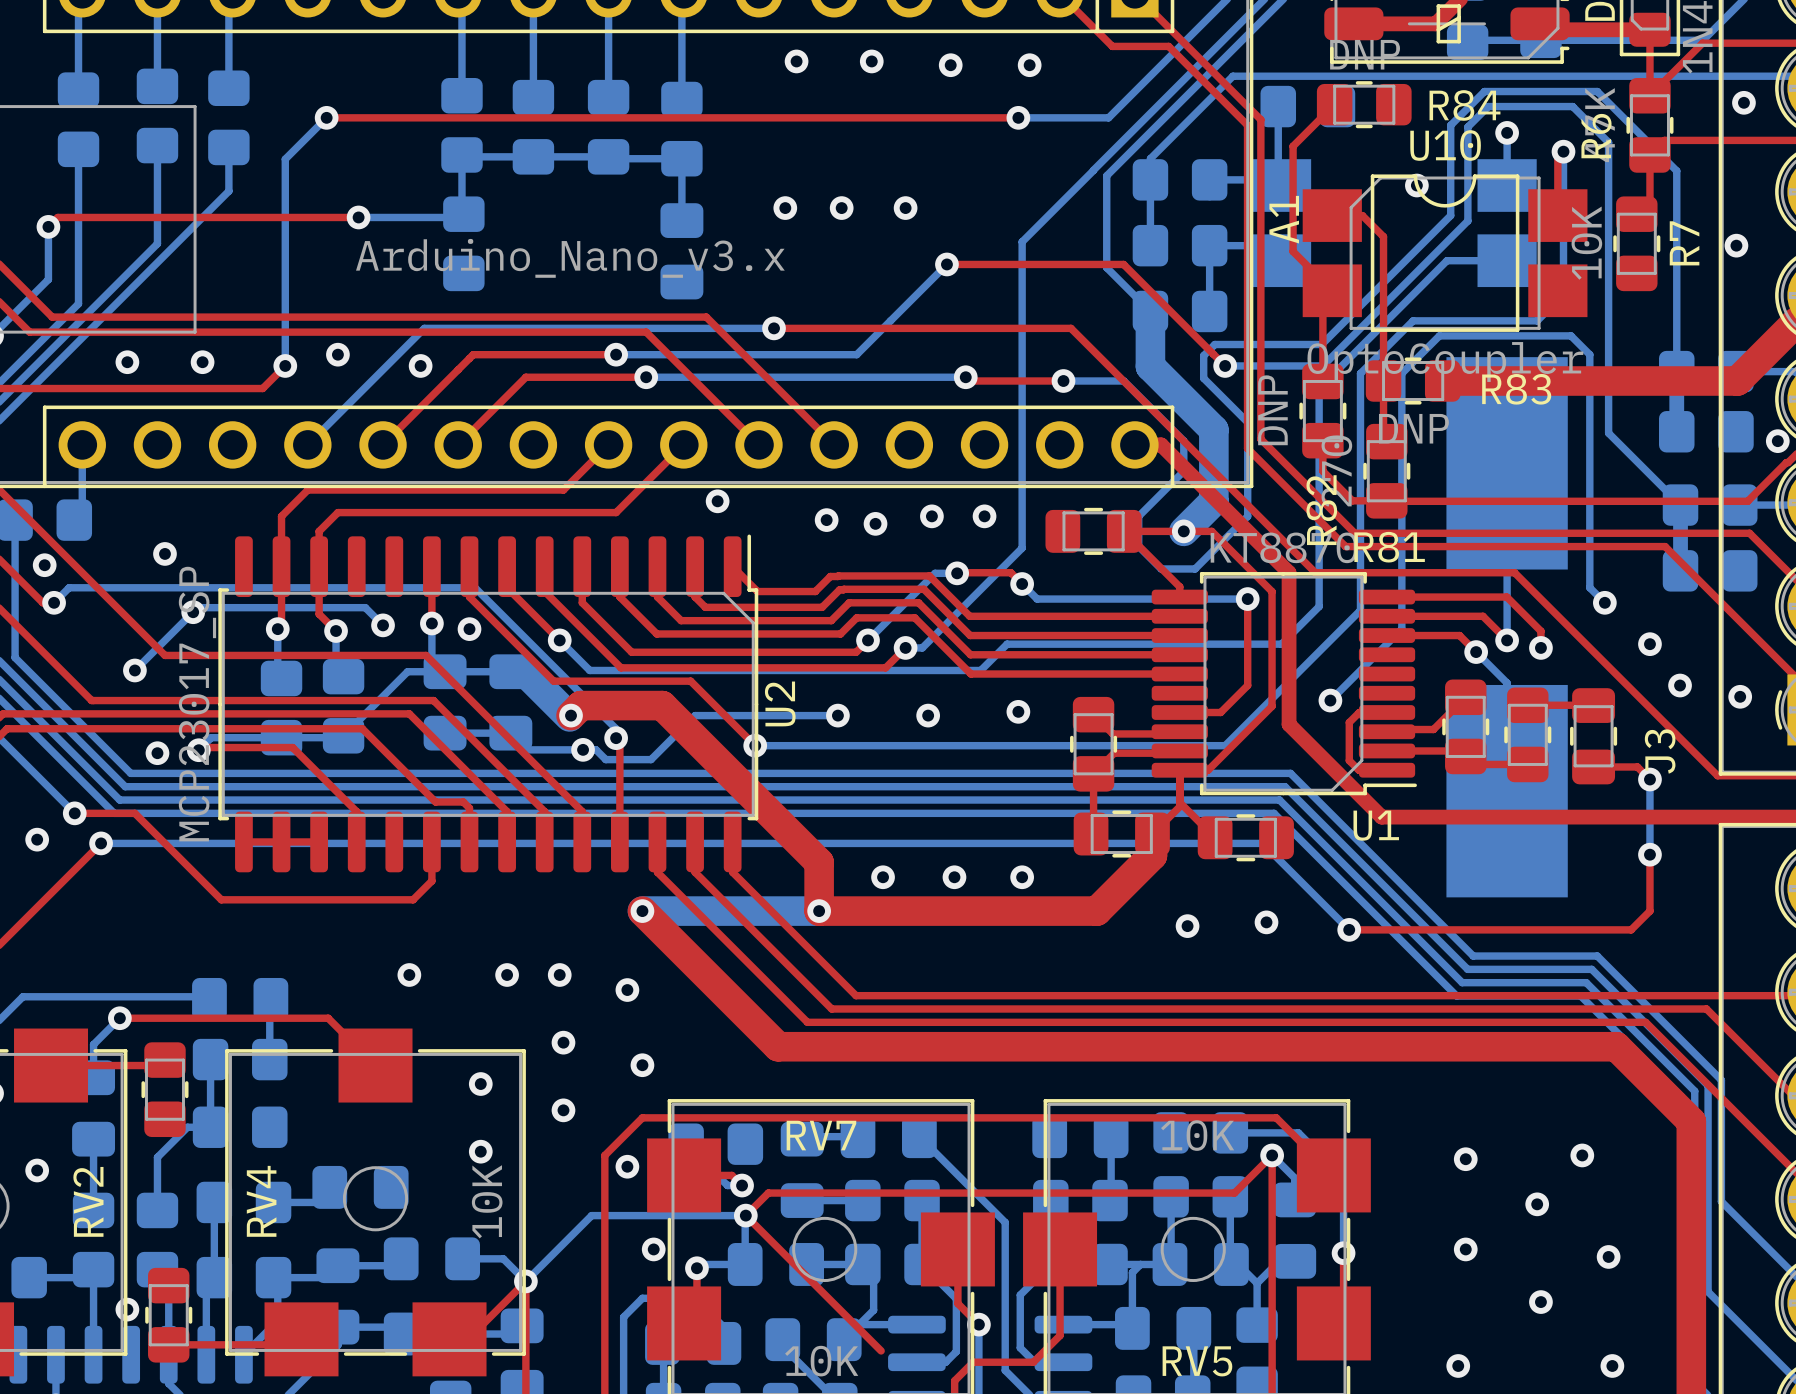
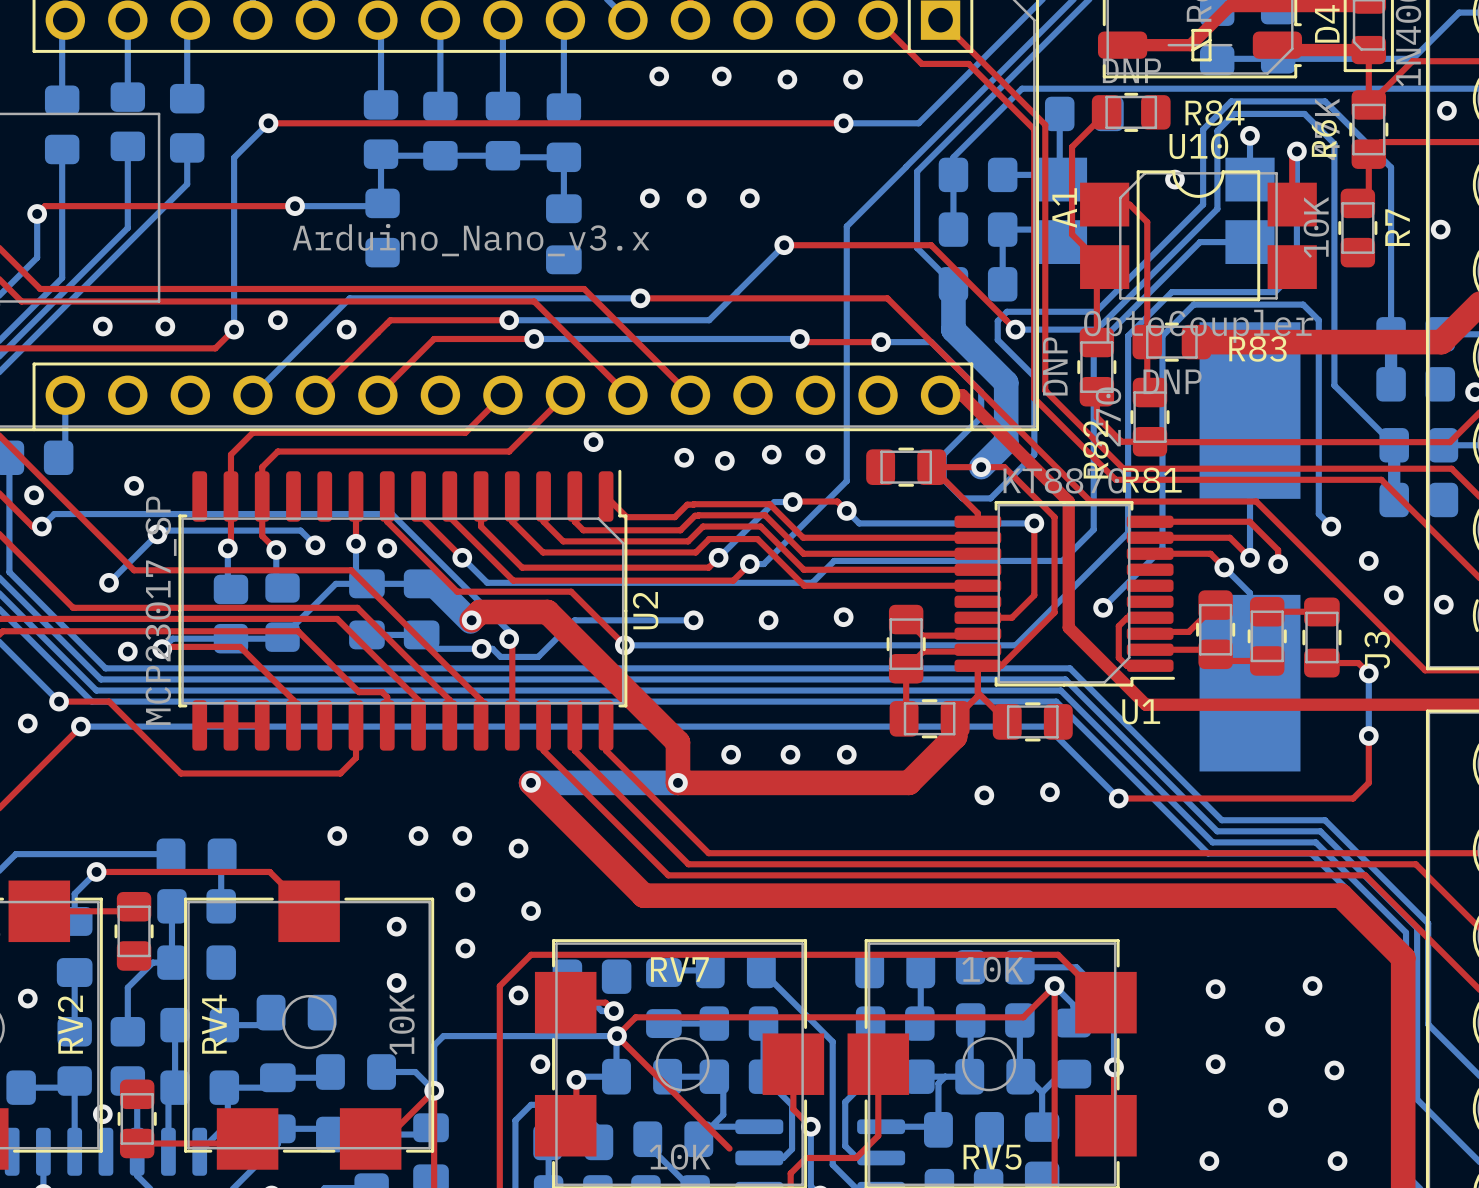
bottom track: (591, 1215) (525, 1281) -> (488, 1036) (443, 1036) (434, 1045) (434, 1090)

